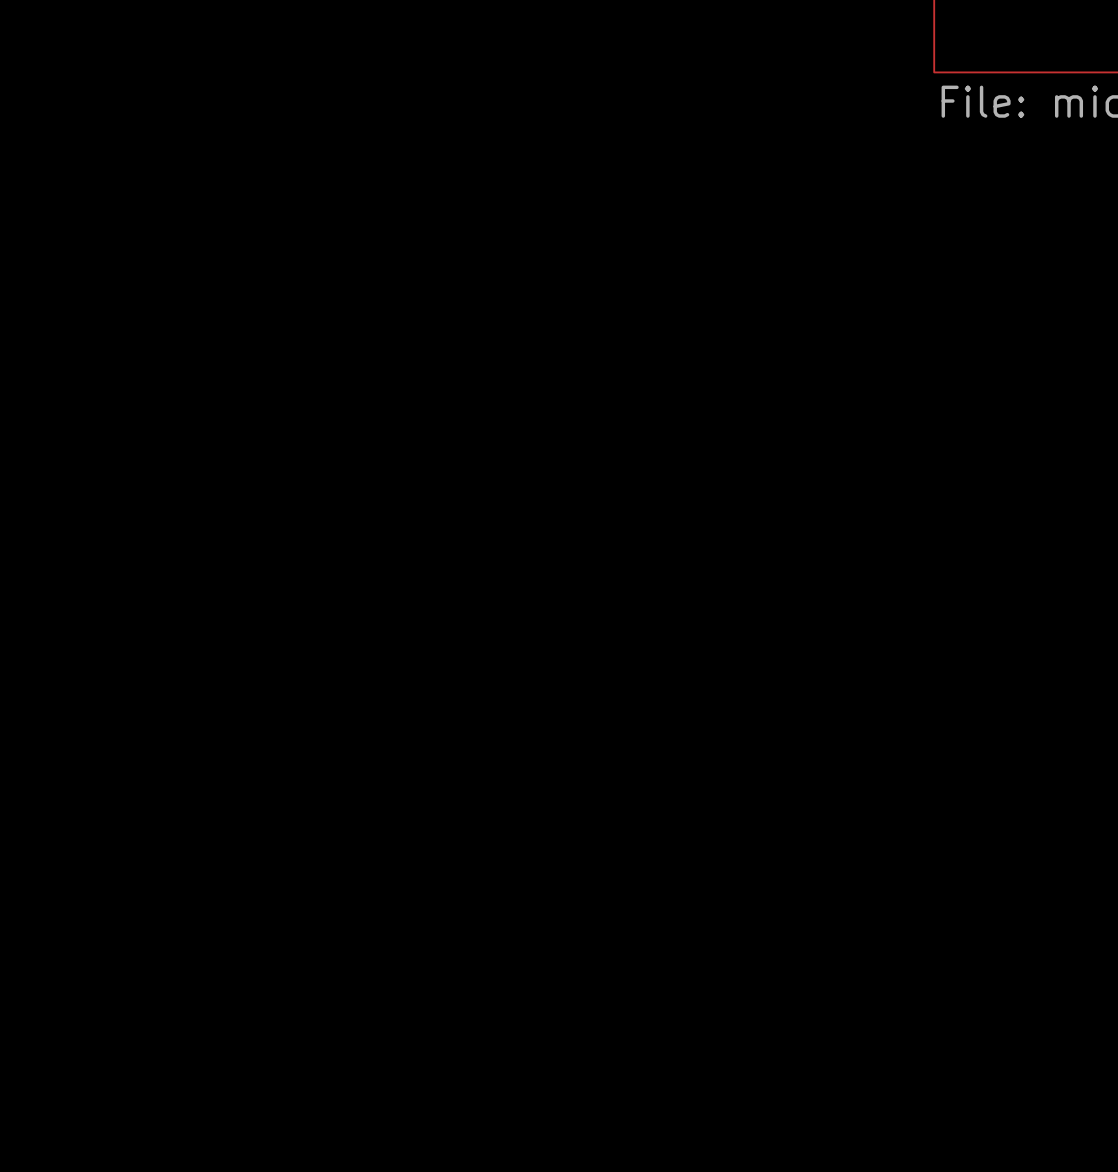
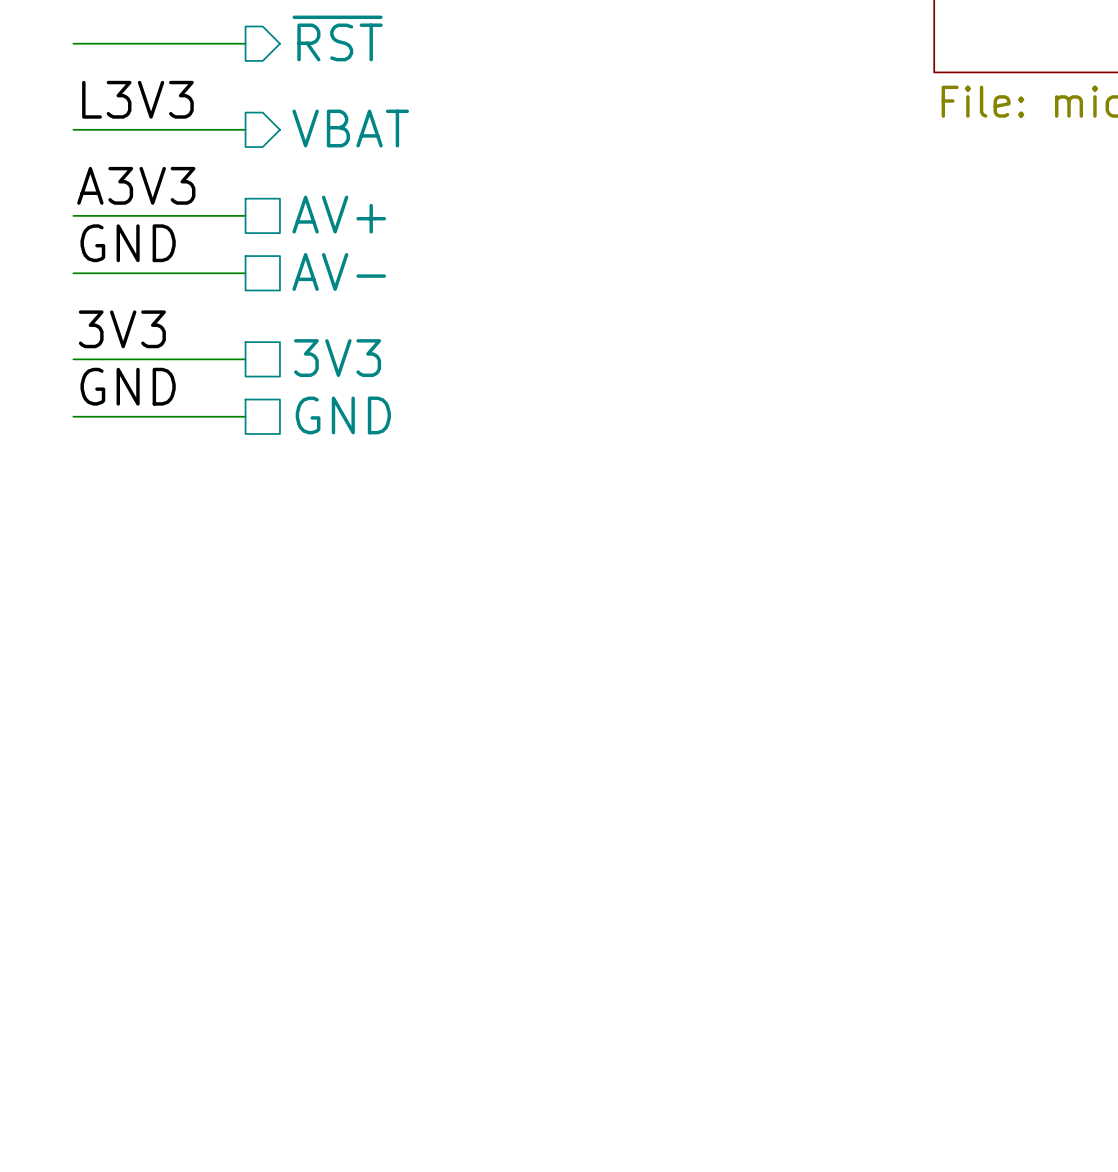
sheet pin: none -> ~{RST} (337, 38)
wire: none -> (73, 43) (245, 43)
label: none -> L3V3 (137, 99)
sheet pin: none -> VBAT (350, 128)
wire: none -> (73, 129) (245, 129)
label: none -> A3V3 (136, 185)
sheet pin: none -> AV+ (339, 214)
wire: none -> (73, 215) (245, 215)
label: none -> GND (128, 243)
sheet pin: none -> AV- (339, 271)
wire: none -> (73, 273) (245, 273)
label: none -> 3V3 (122, 329)
sheet pin: none -> 3V3 (337, 358)
wire: none -> (73, 359) (245, 359)
label: none -> GND (128, 386)
sheet pin: none -> GND (343, 415)
wire: none -> (73, 416) (245, 416)

